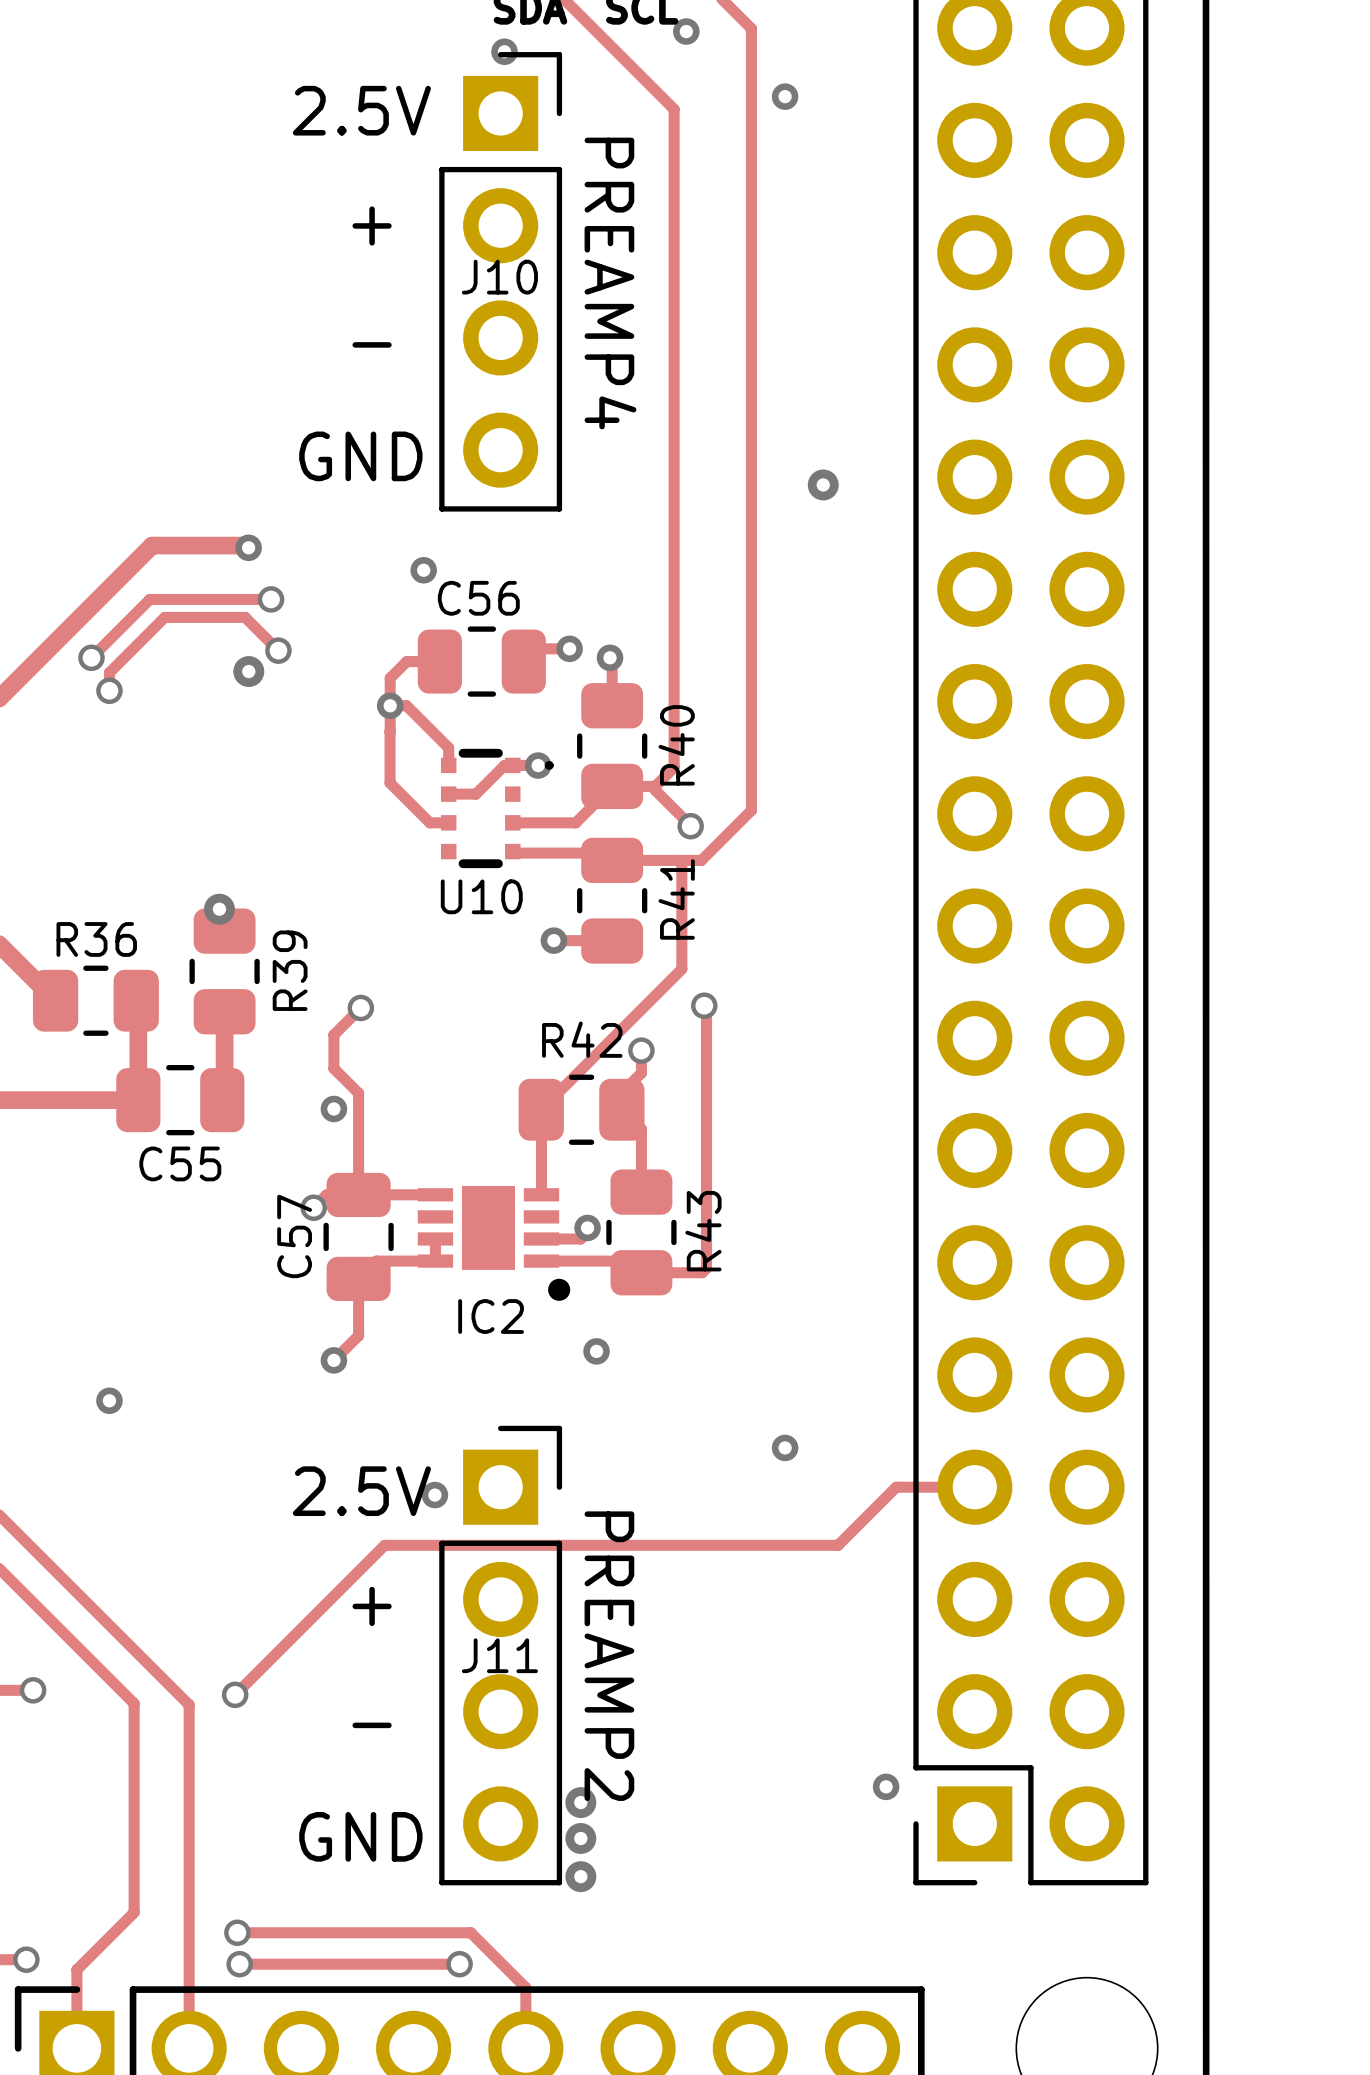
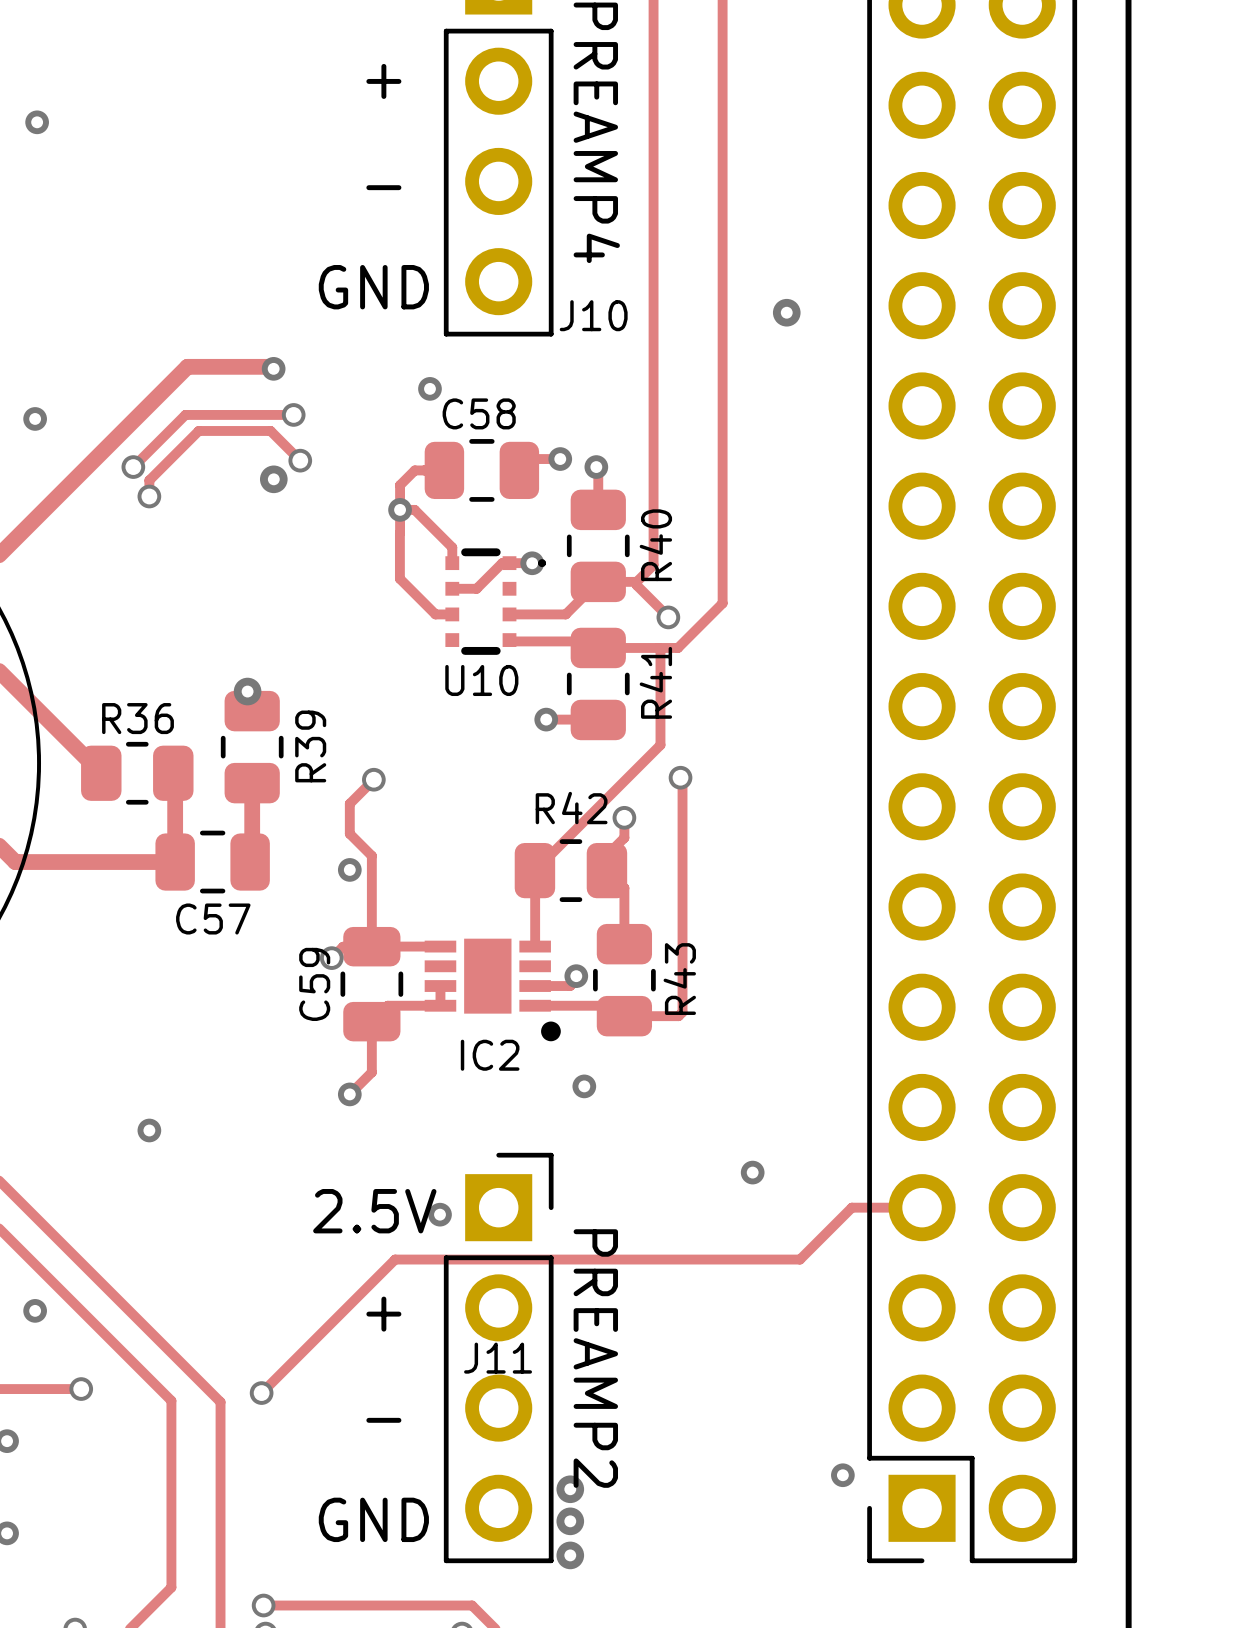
J10 name position: J10 (499, 277) -> J10 (593, 315)
C56 name: C56 (478, 598) -> C58 (479, 413)
C55 name: C55 (180, 1163) -> C57 (213, 919)
C57 name: C57 (294, 1236) -> C59 (314, 984)

